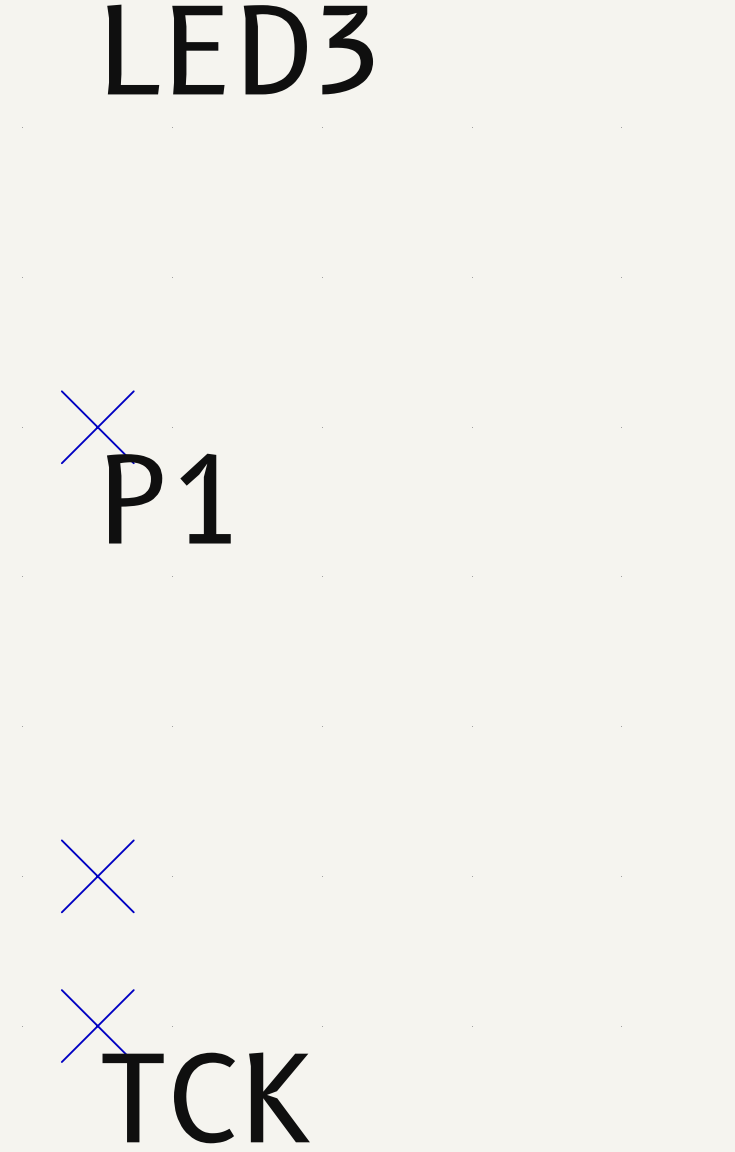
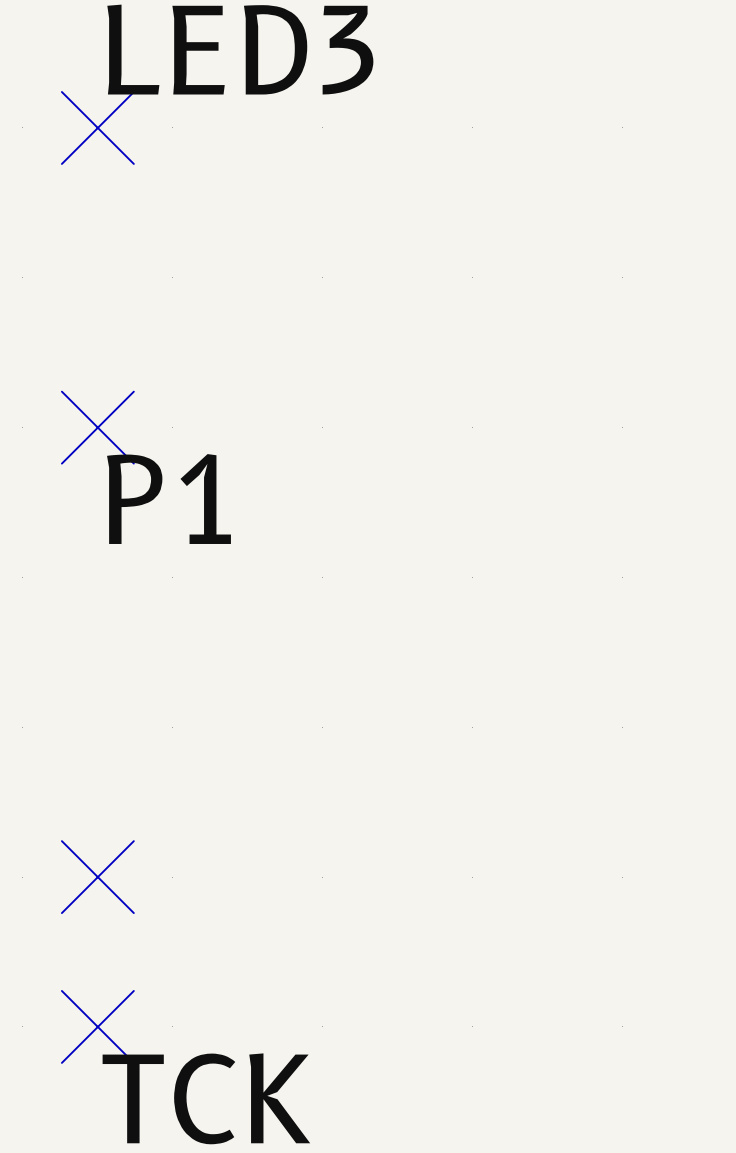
no-connect mark: none -> (97, 127)

